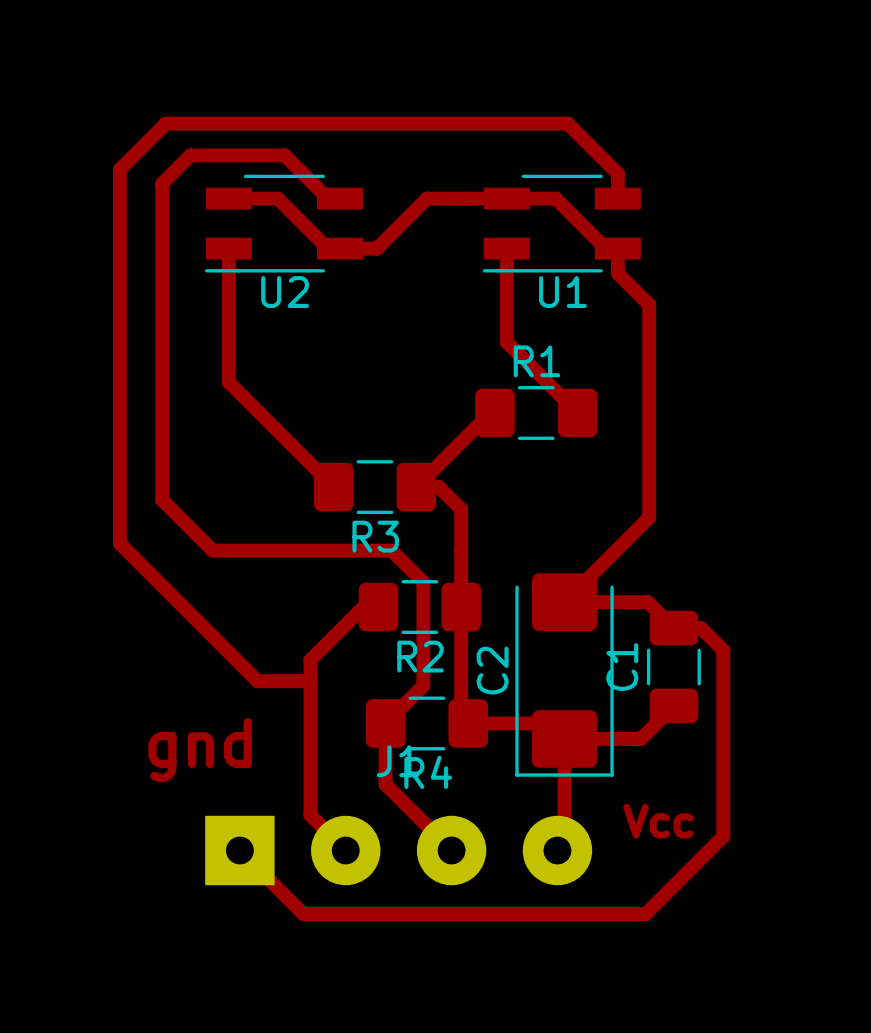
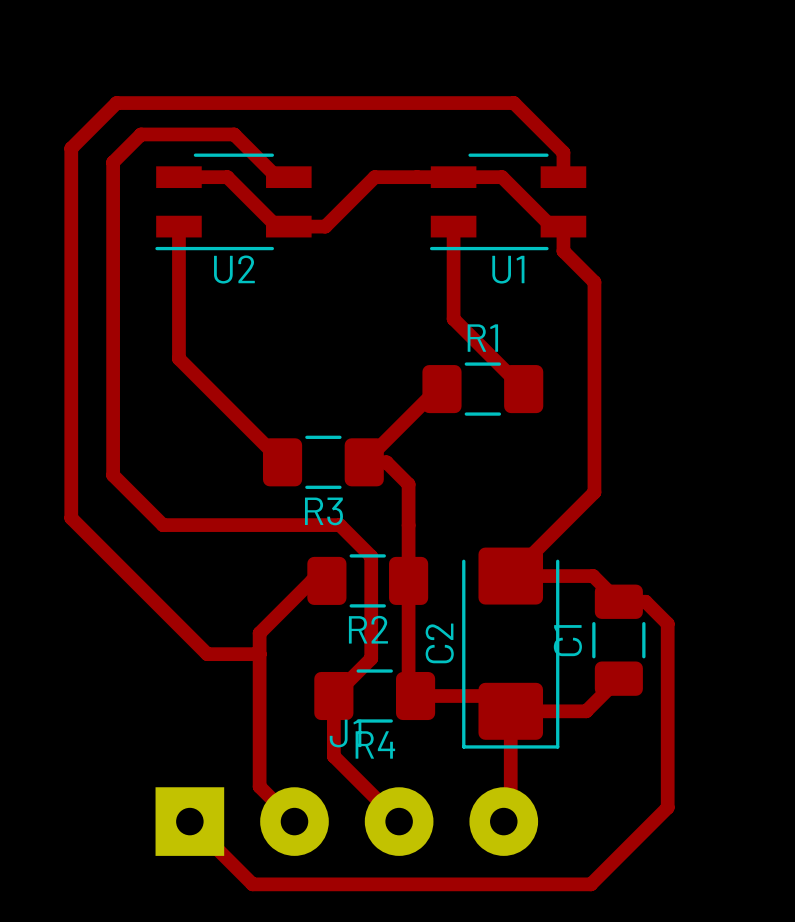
text: gnd (200, 750) -> none
text: Vcc (658, 821) -> none

